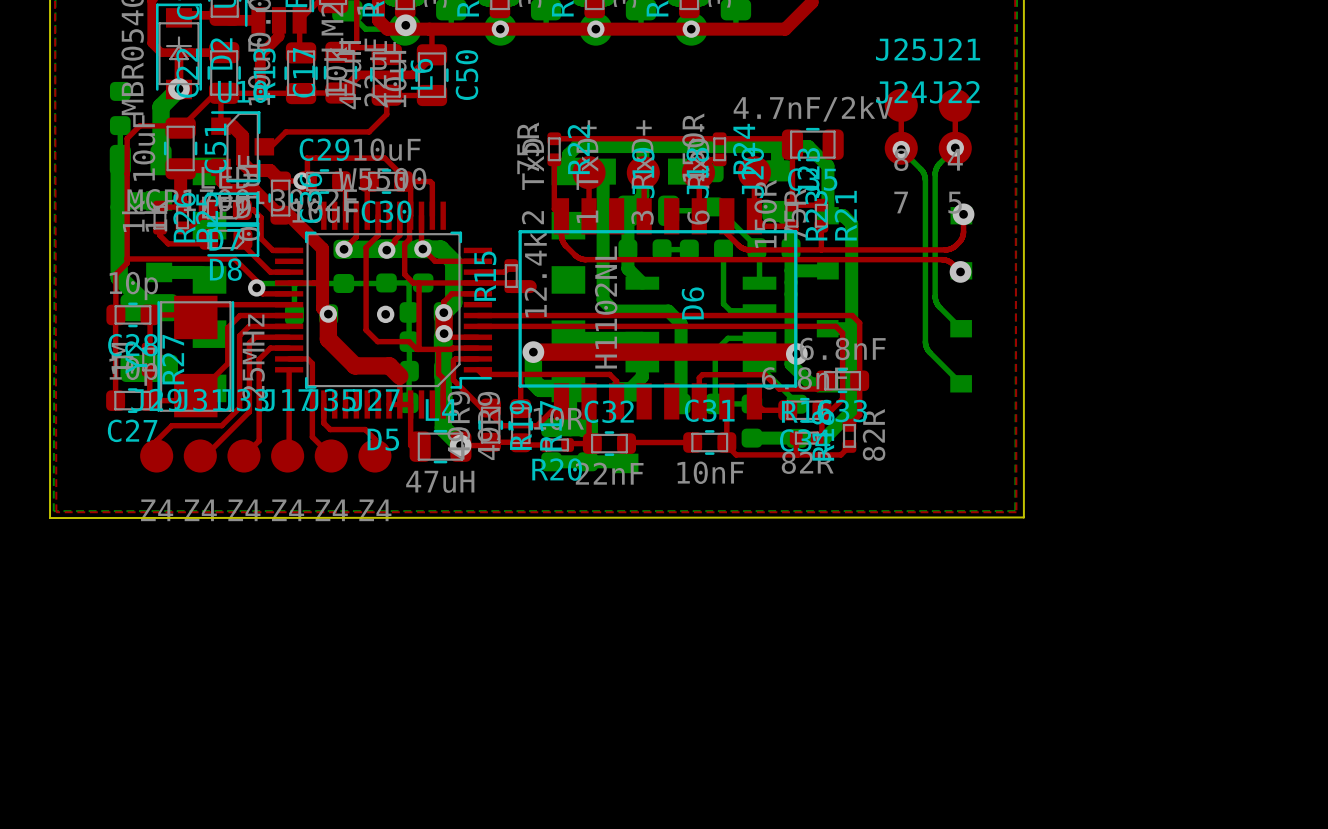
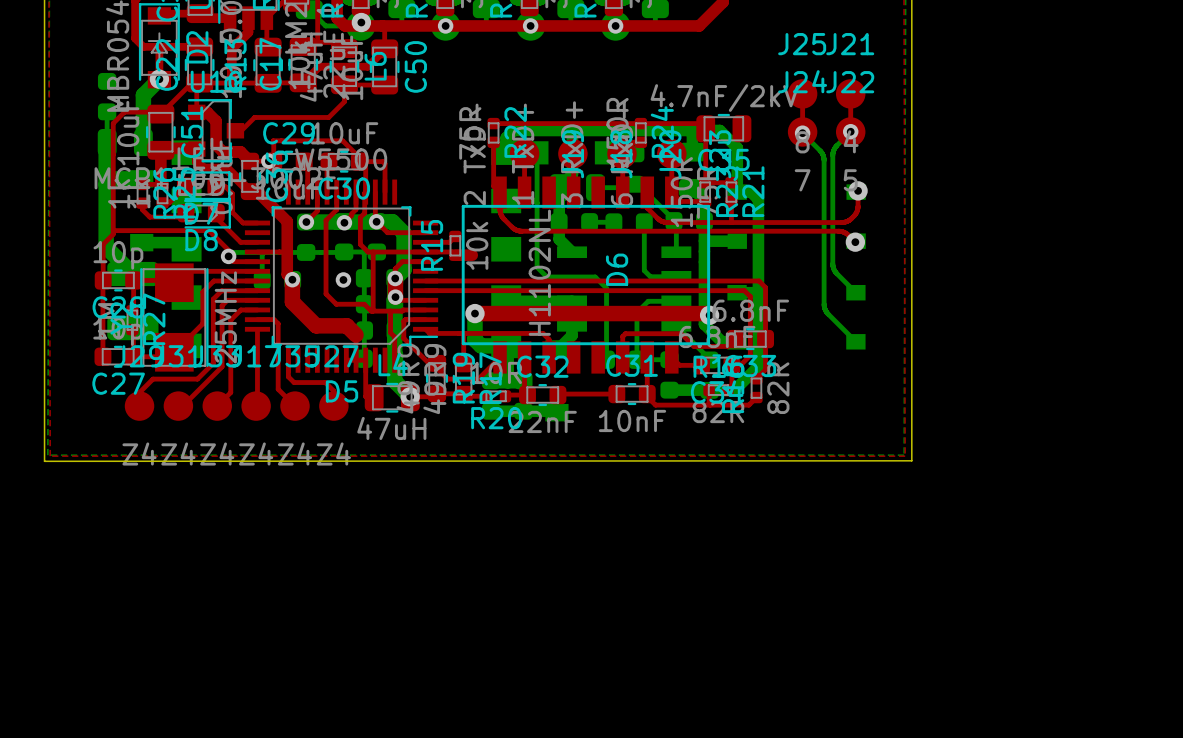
bottom track width: thick (603, 174) (603, 300) (614, 311) (668, 311) (681, 323) (681, 403) -> thin (537, 155) (537, 267) (546, 277) (595, 277) (606, 288) (606, 359)
R15 value: 12.4k (535, 274) -> 10k (477, 245)

